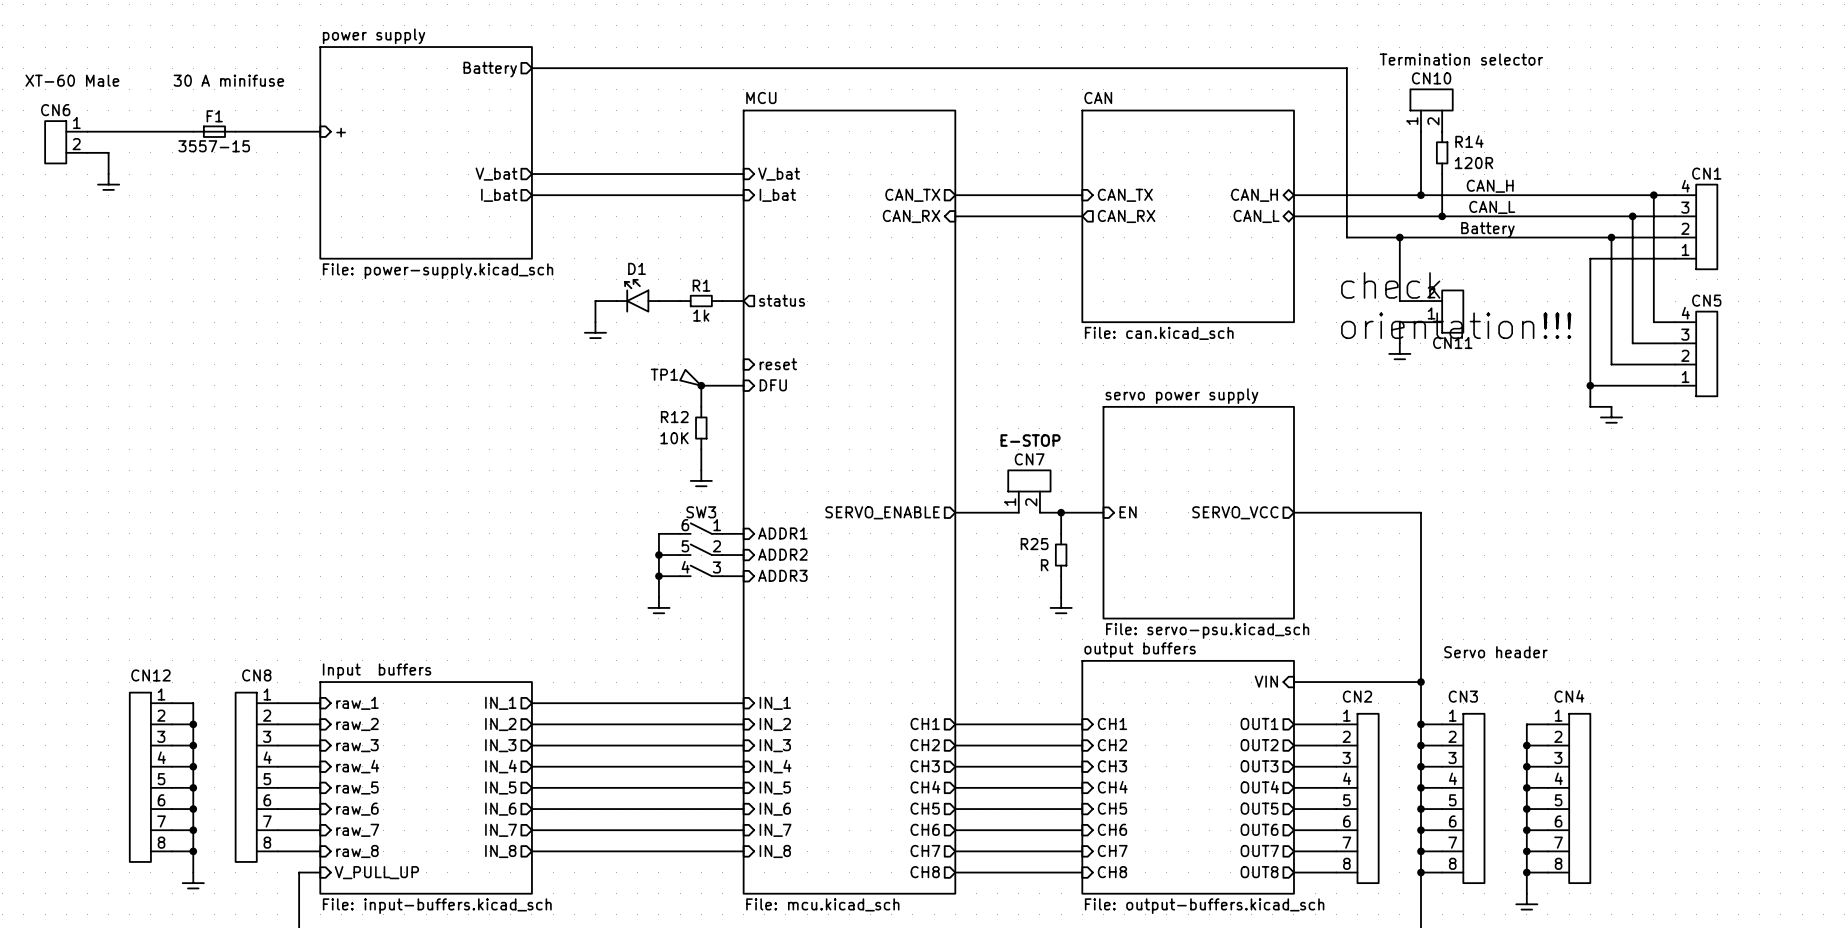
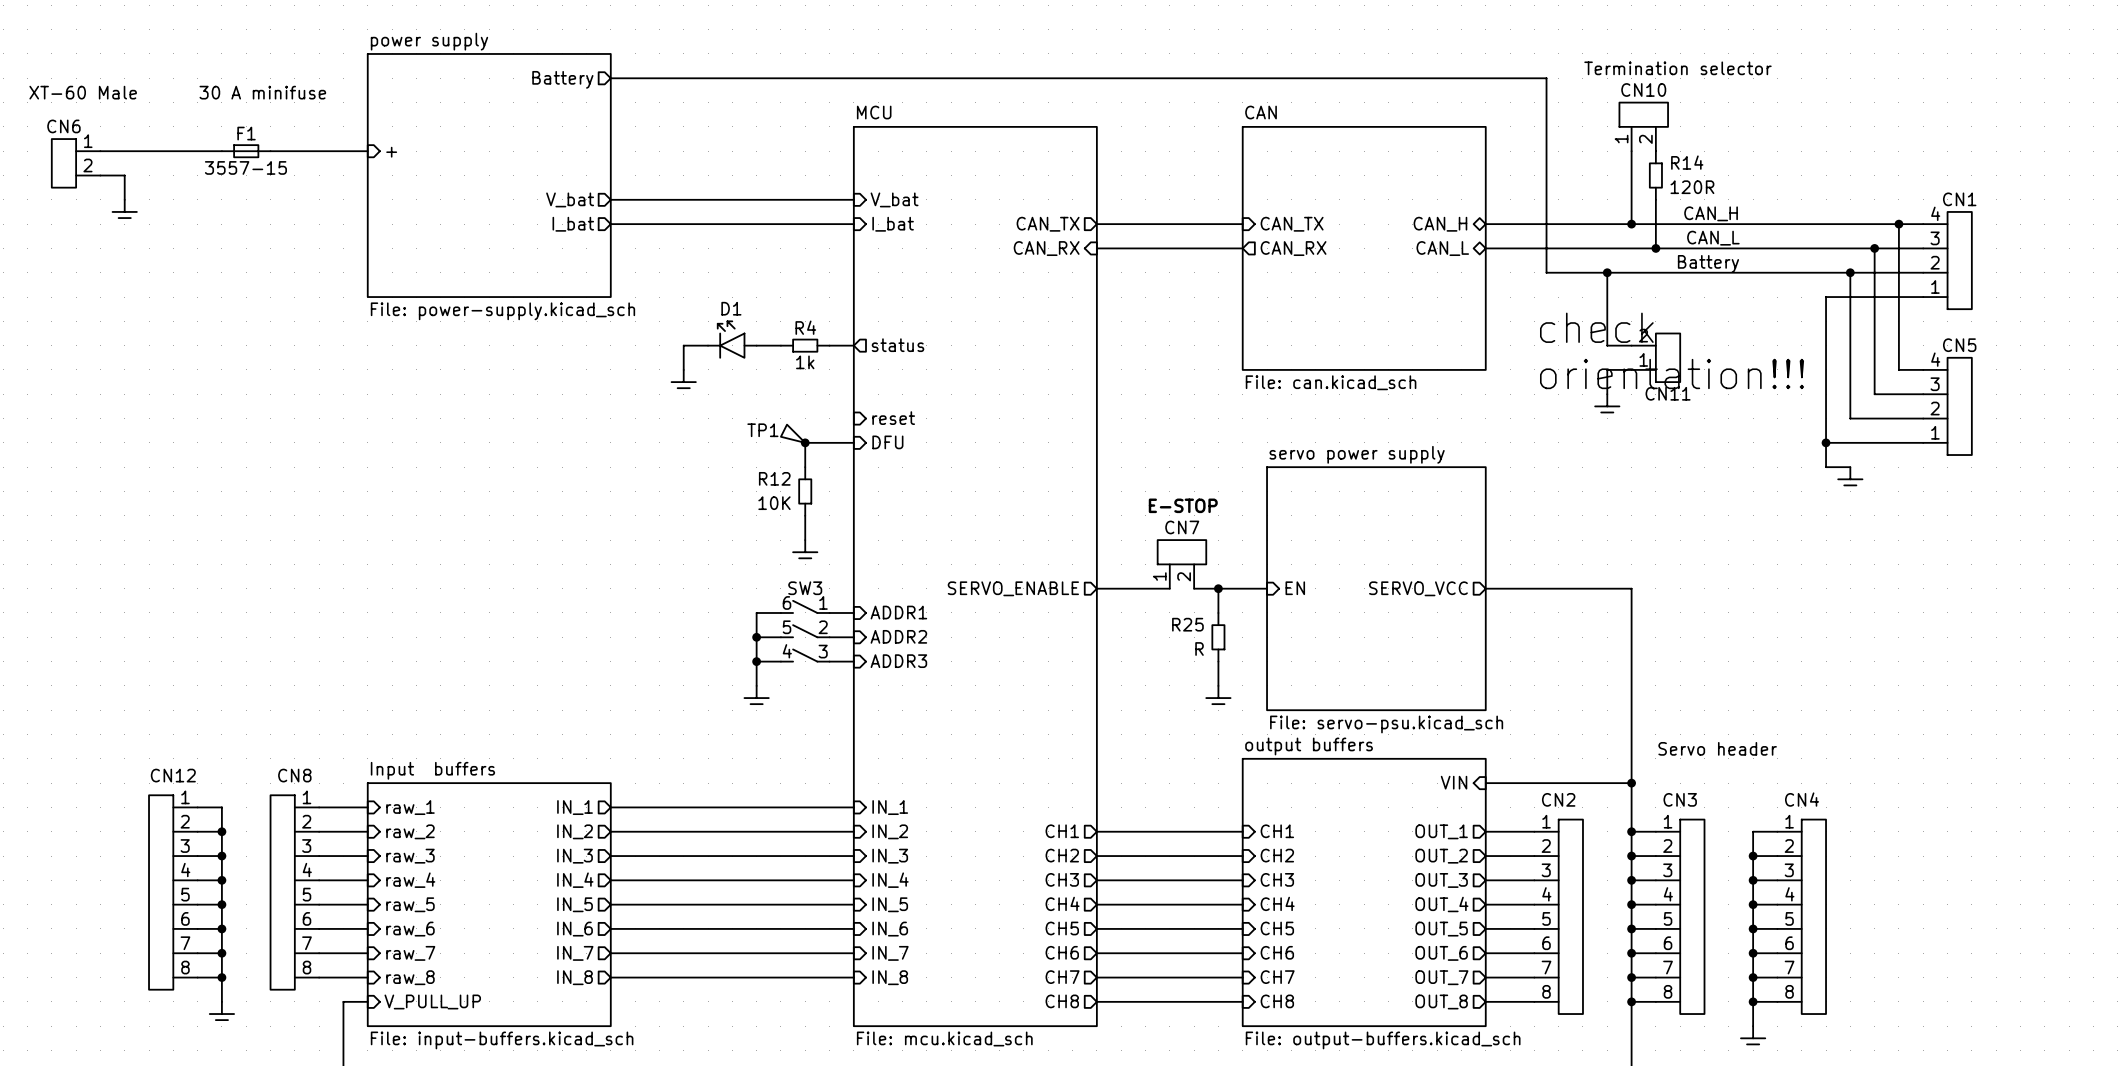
R1 name: R1 (701, 285) -> R4 (805, 327)
sheet pin: OUT1 (1259, 723) -> OUT_1 (1441, 831)
sheet pin: OUT2 (1259, 745) -> OUT_2 (1441, 856)
sheet pin: OUT3 (1259, 766) -> OUT_3 (1441, 880)
sheet pin: OUT4 (1259, 787) -> OUT_4 (1441, 904)
sheet pin: OUT5 (1259, 808) -> OUT_5 (1441, 929)
sheet pin: OUT6 (1259, 829) -> OUT_6 (1441, 953)
sheet pin: OUT7 (1259, 850) -> OUT_7 (1441, 977)
sheet pin: OUT8 (1259, 872) -> OUT_8 (1441, 1001)

